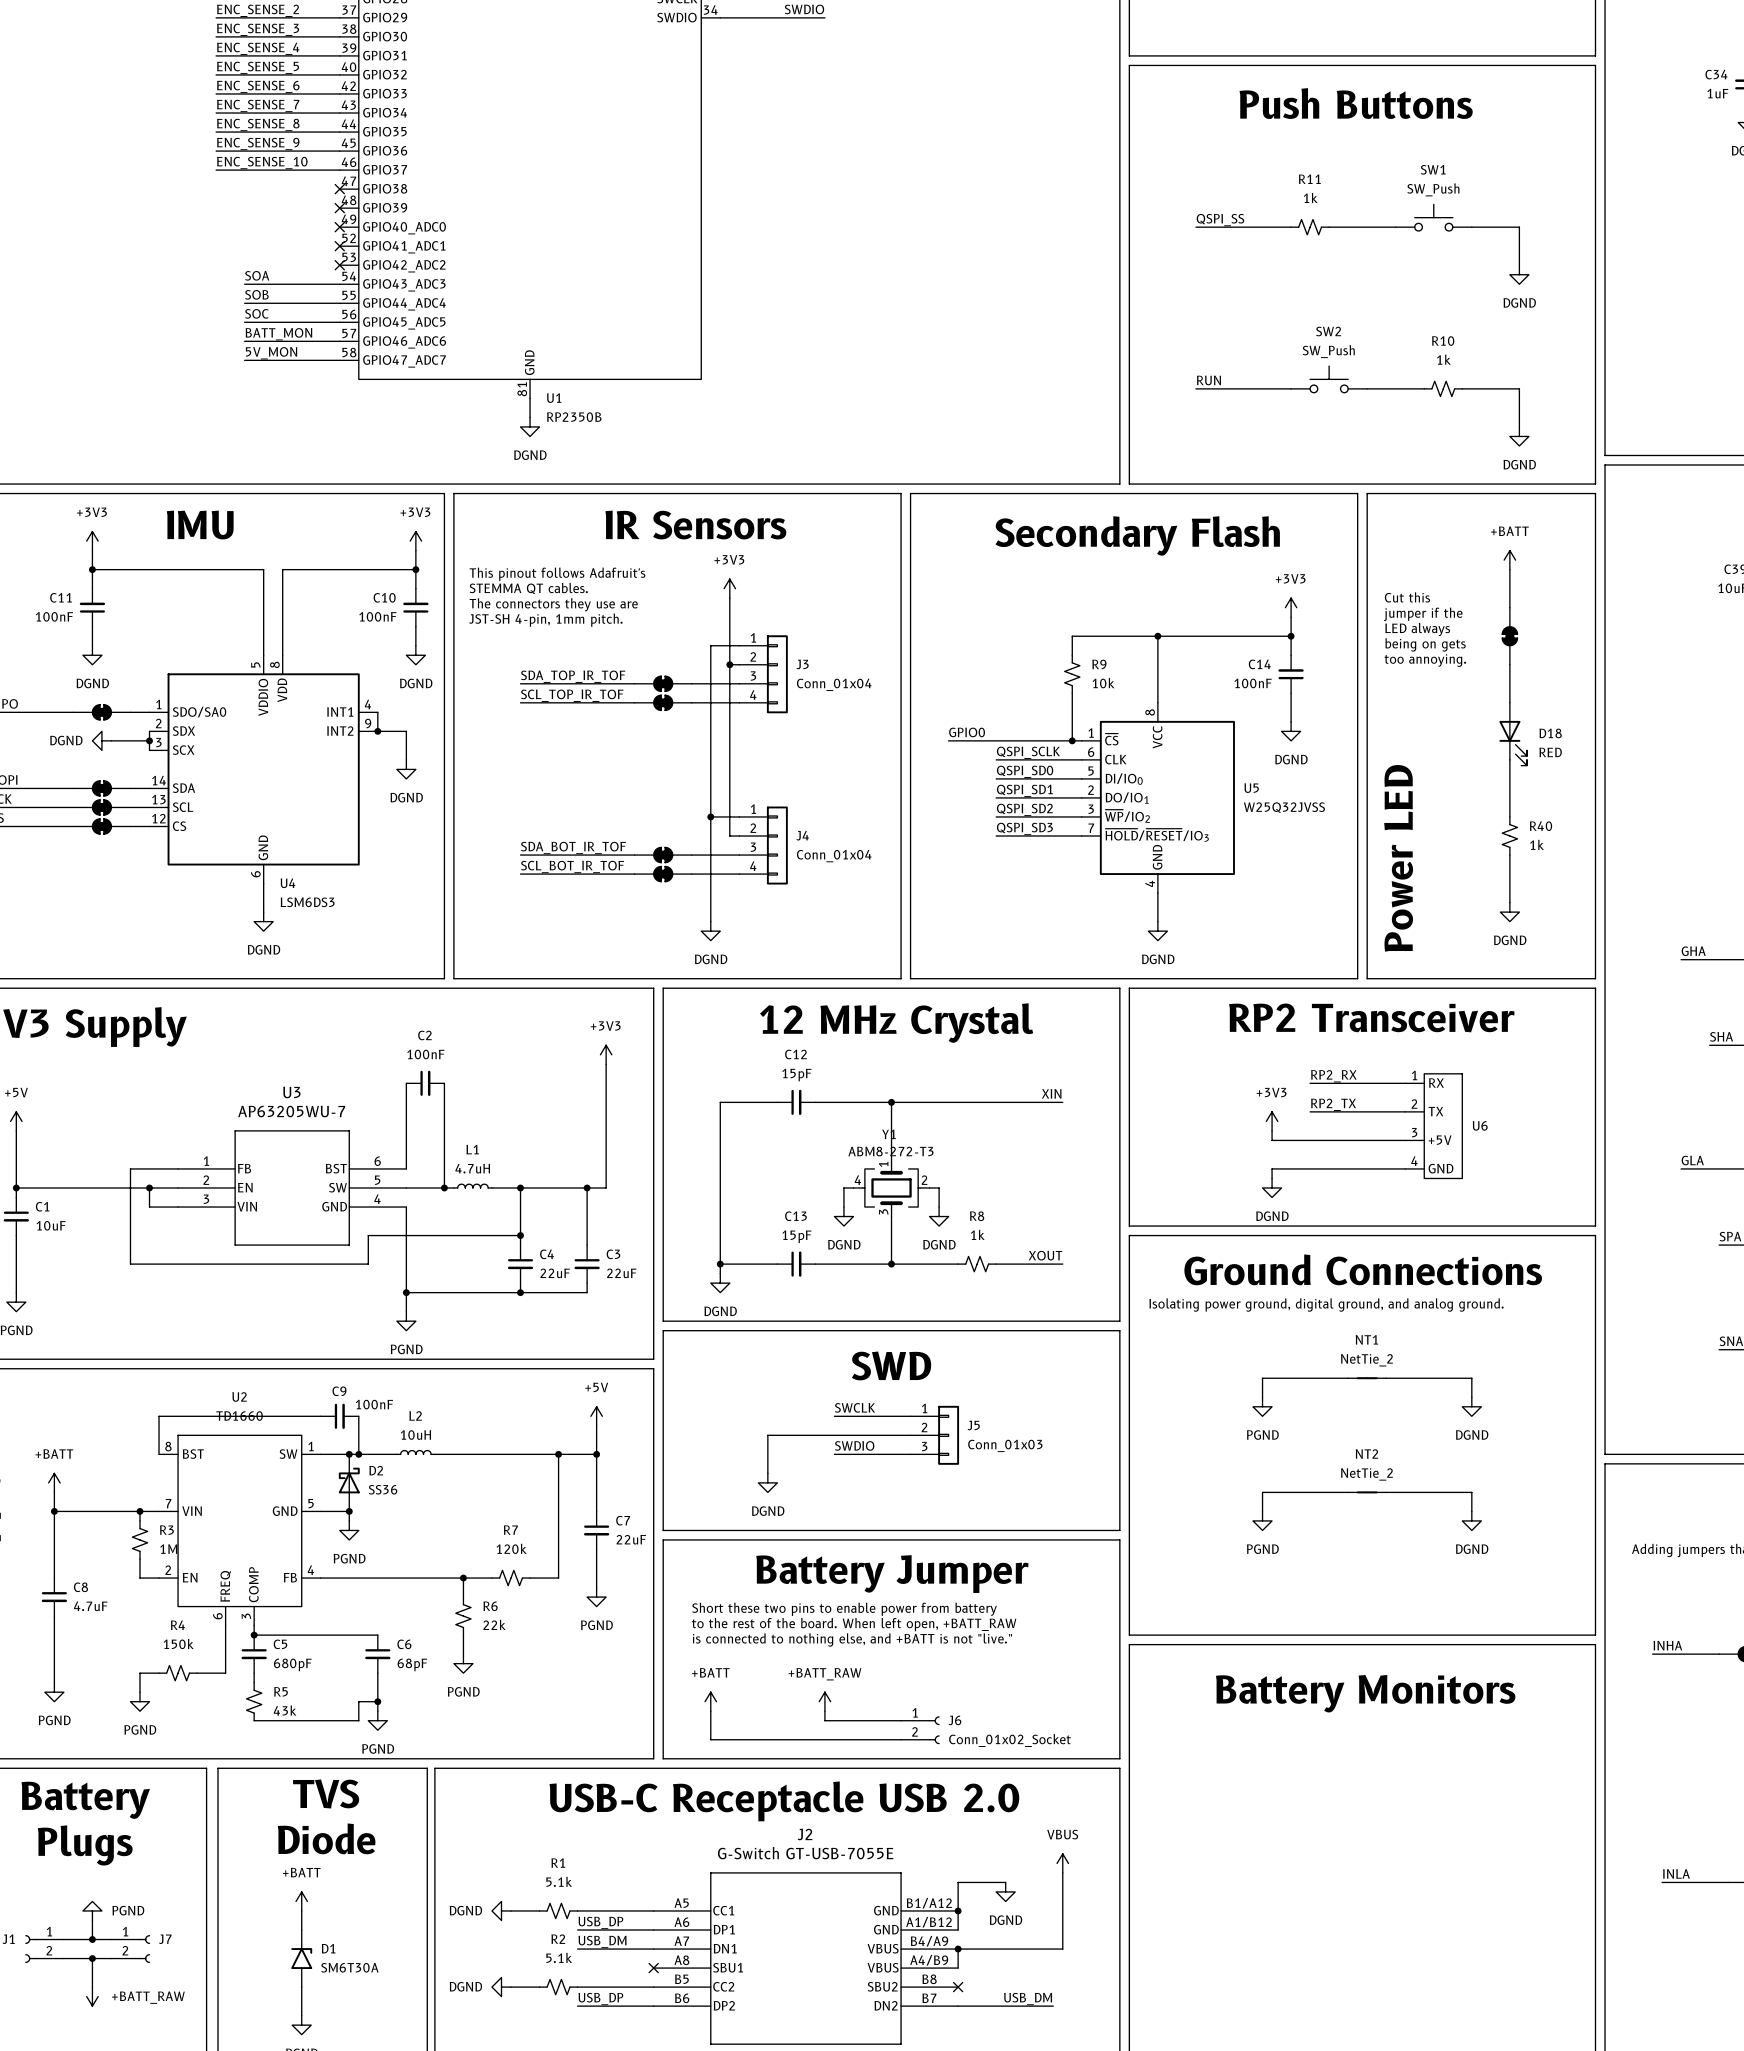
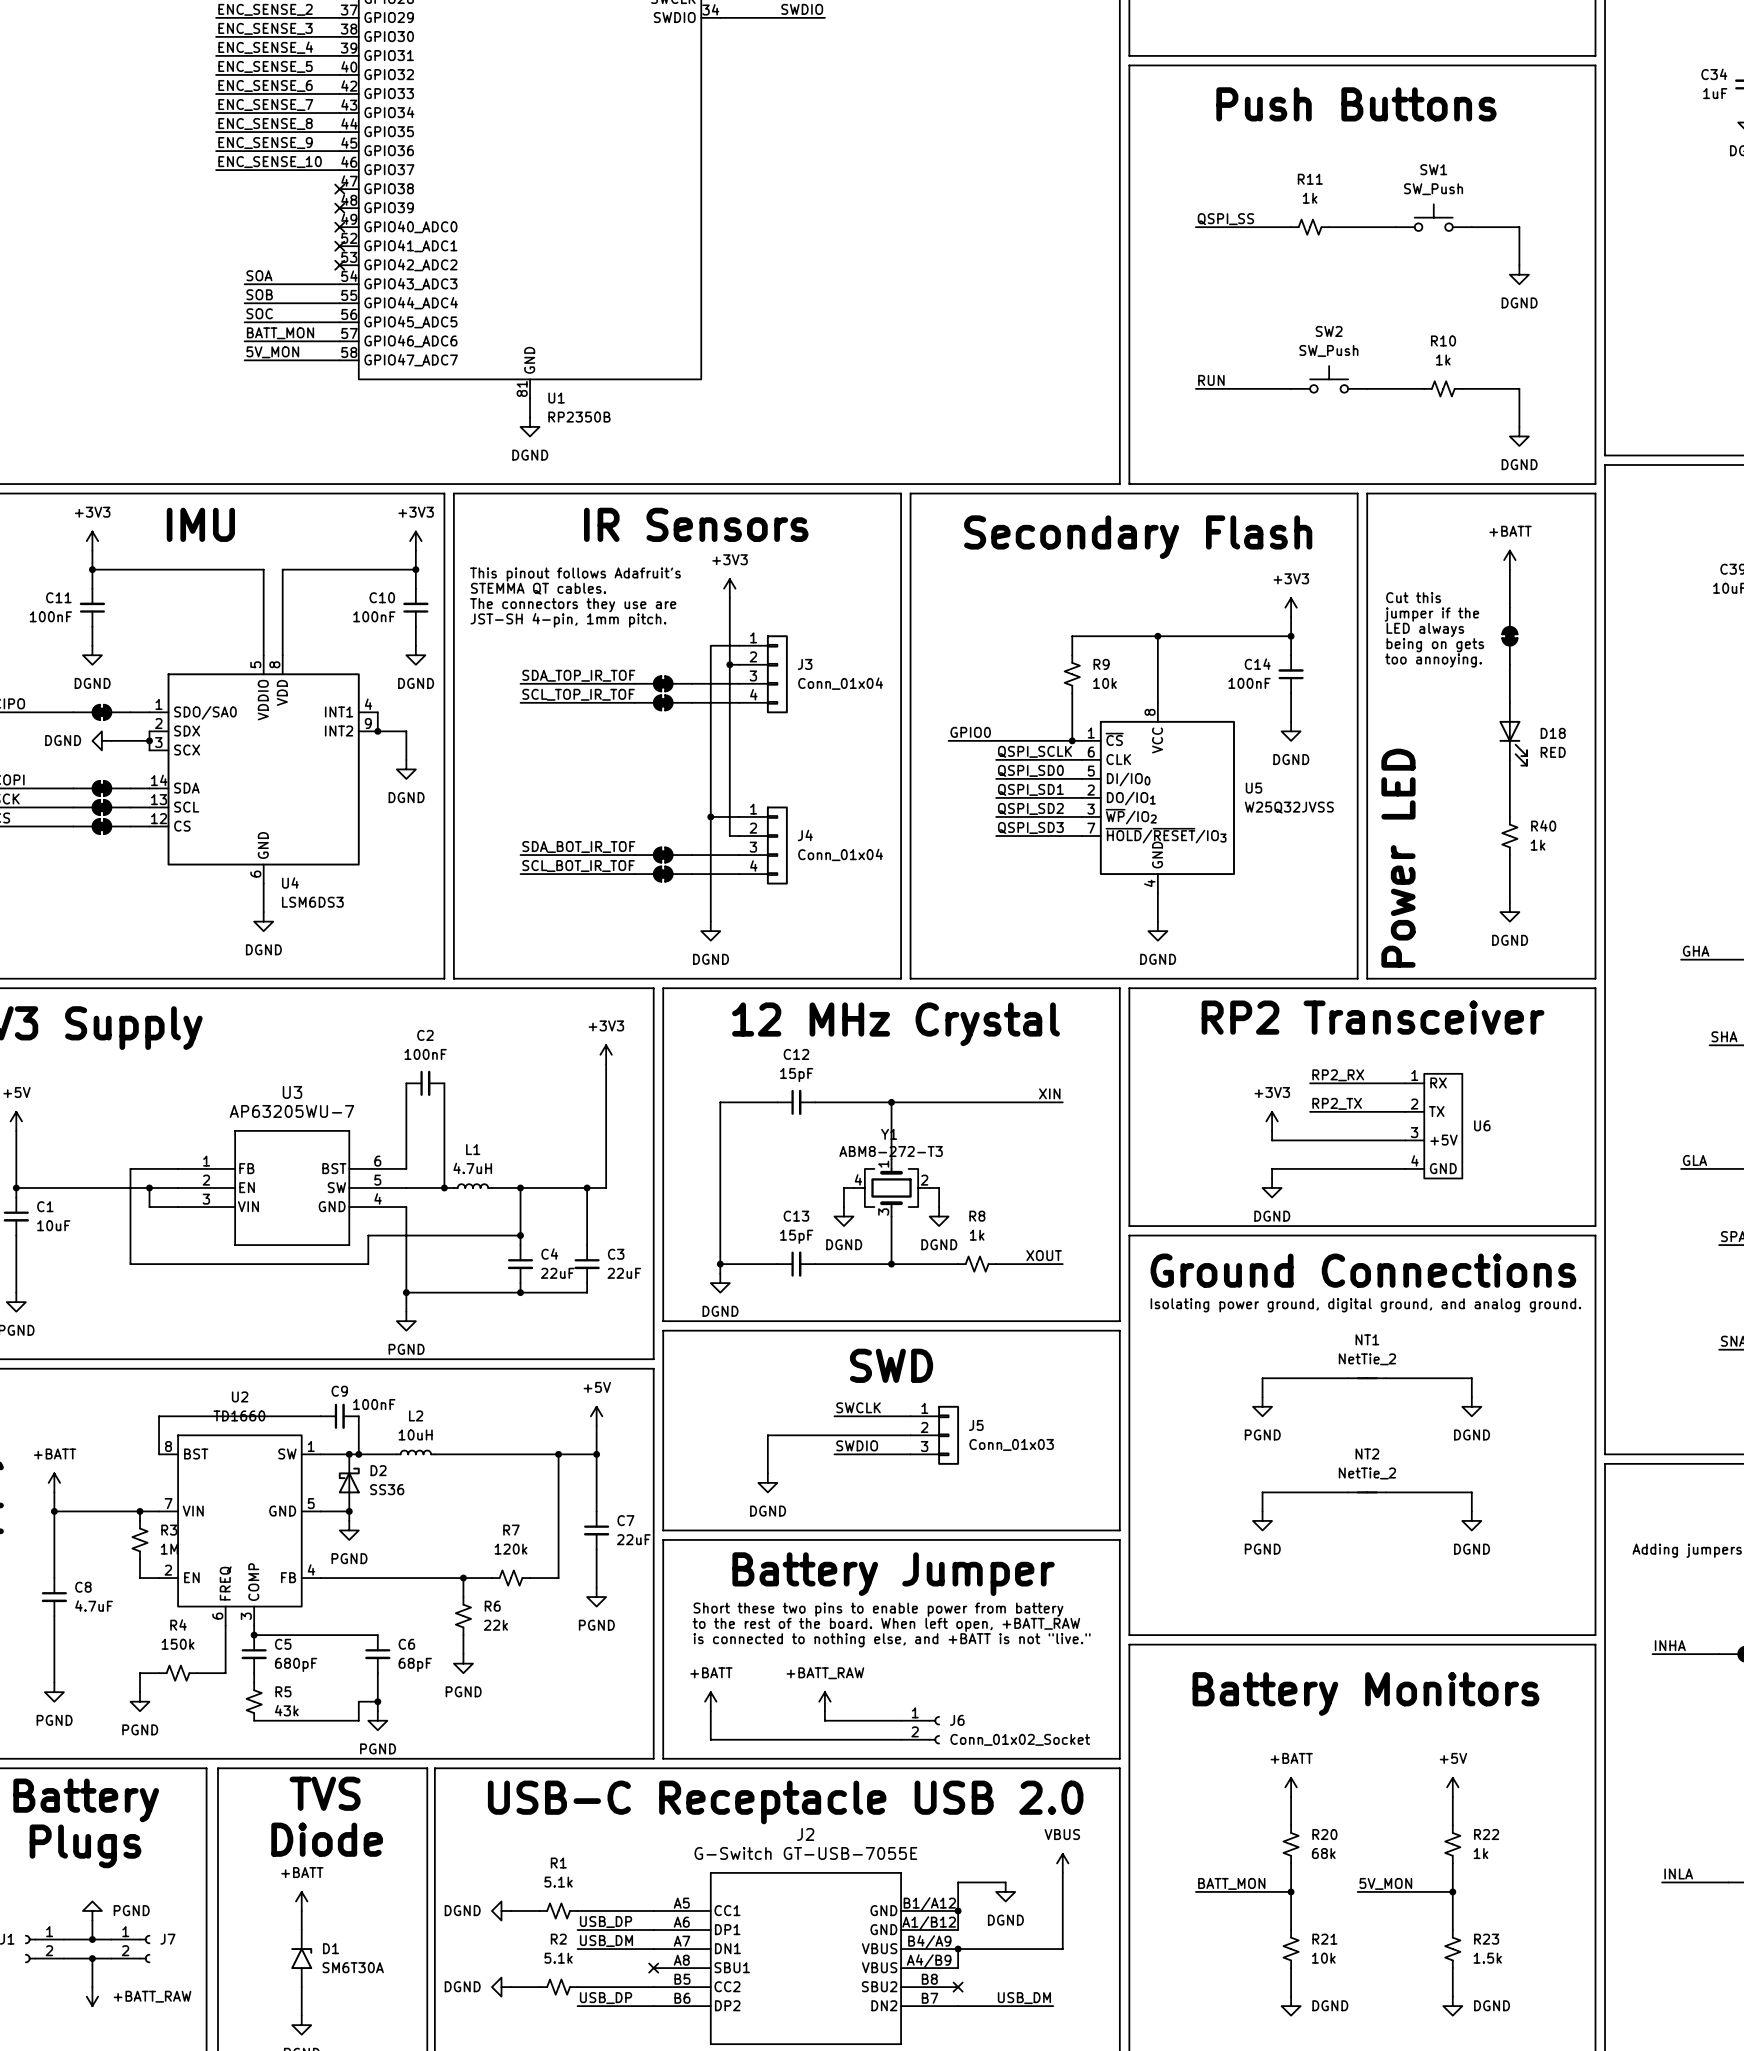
power symbol: none -> +BATT (1291, 1787)
power symbol: none -> +5V (1452, 1787)
wire: none -> (1291, 1796) (1291, 1825)
wire: none -> (1452, 1796) (1452, 1825)
R20: none -> 68k (1291, 1844)
R22: none -> 1k (1452, 1844)
wire: none -> (1291, 1863) (1291, 1930)
wire: none -> (1452, 1863) (1452, 1930)
label: none -> BATT_MON (1231, 1883)
label: none -> 5V_MON (1385, 1883)
wire: none -> (1195, 1891) (1291, 1891)
junction: none -> (1291, 1891)
wire: none -> (1357, 1891) (1452, 1891)
junction: none -> (1452, 1891)
R21: none -> 10k (1291, 1949)
R23: none -> 1.5k (1452, 1949)
wire: none -> (1291, 1968) (1291, 1996)
wire: none -> (1452, 1968) (1452, 1996)
power symbol: none -> DGND (1291, 2006)
power symbol: none -> DGND (1452, 2006)

